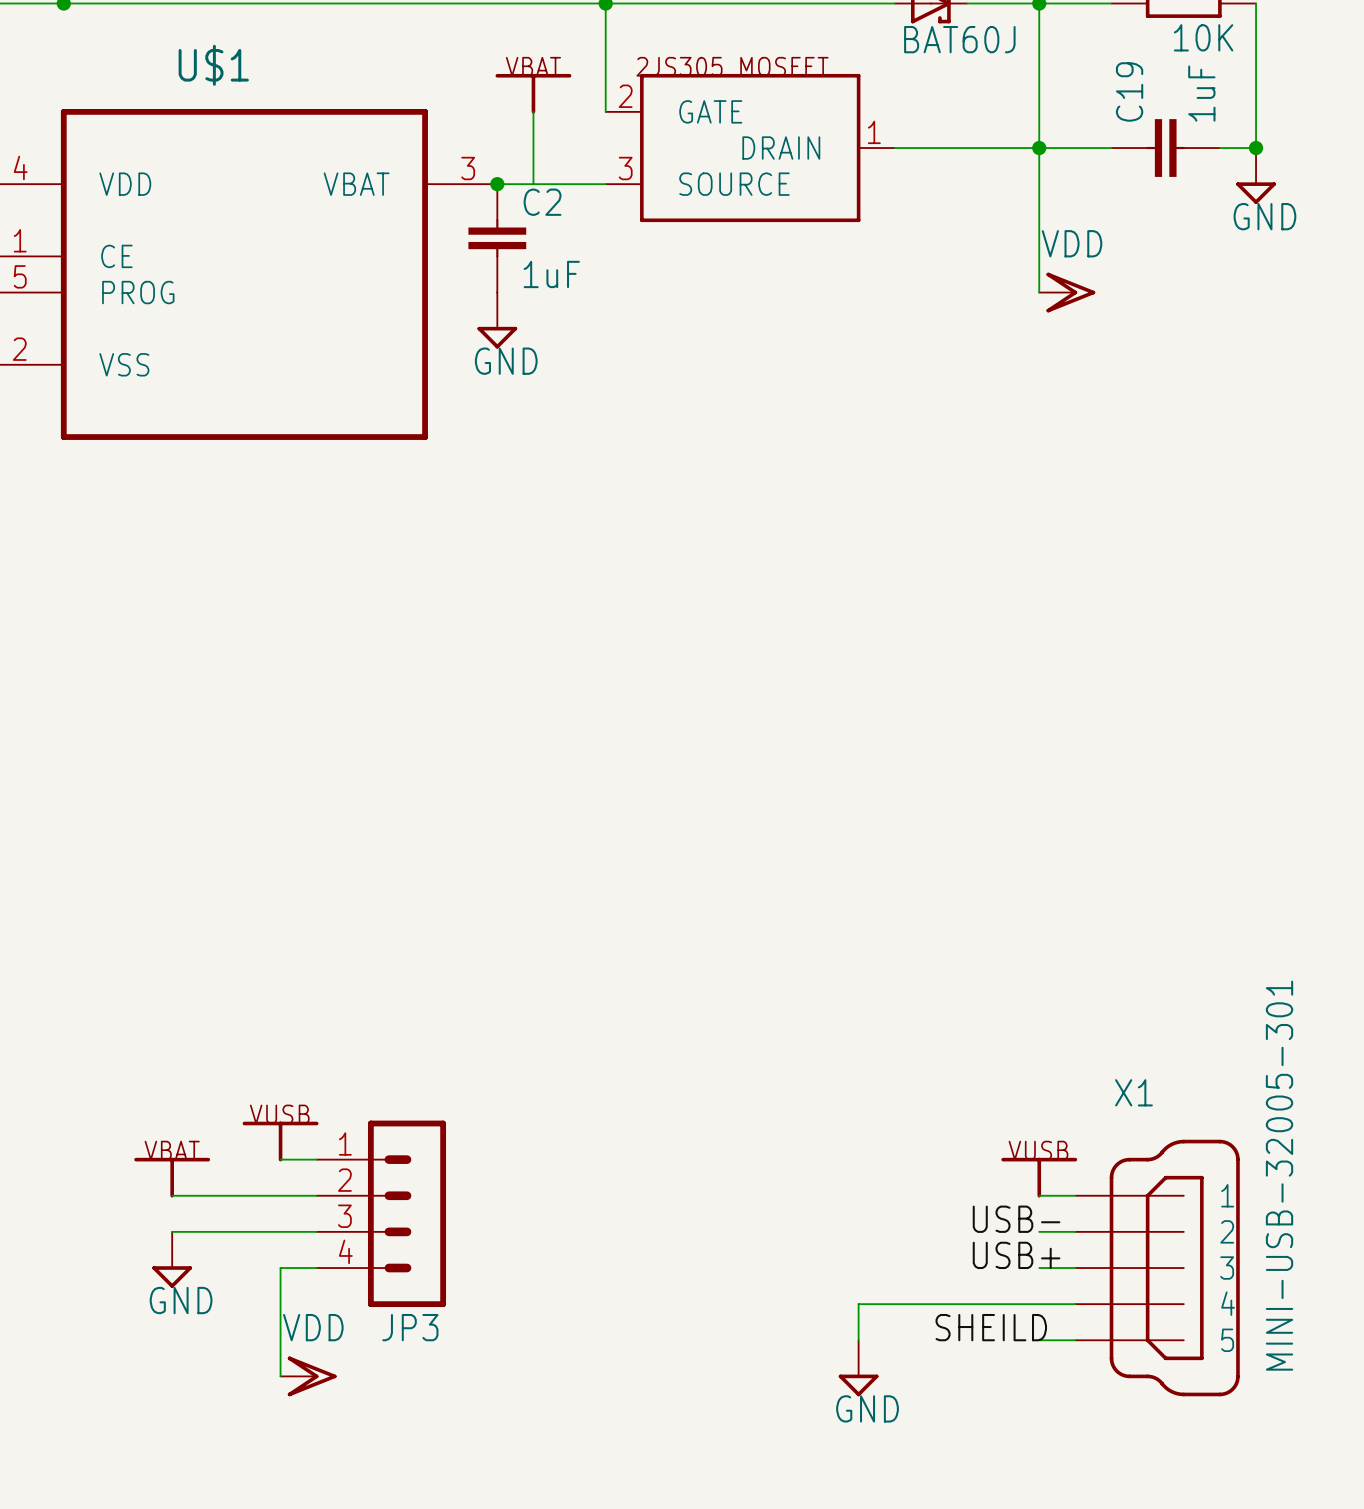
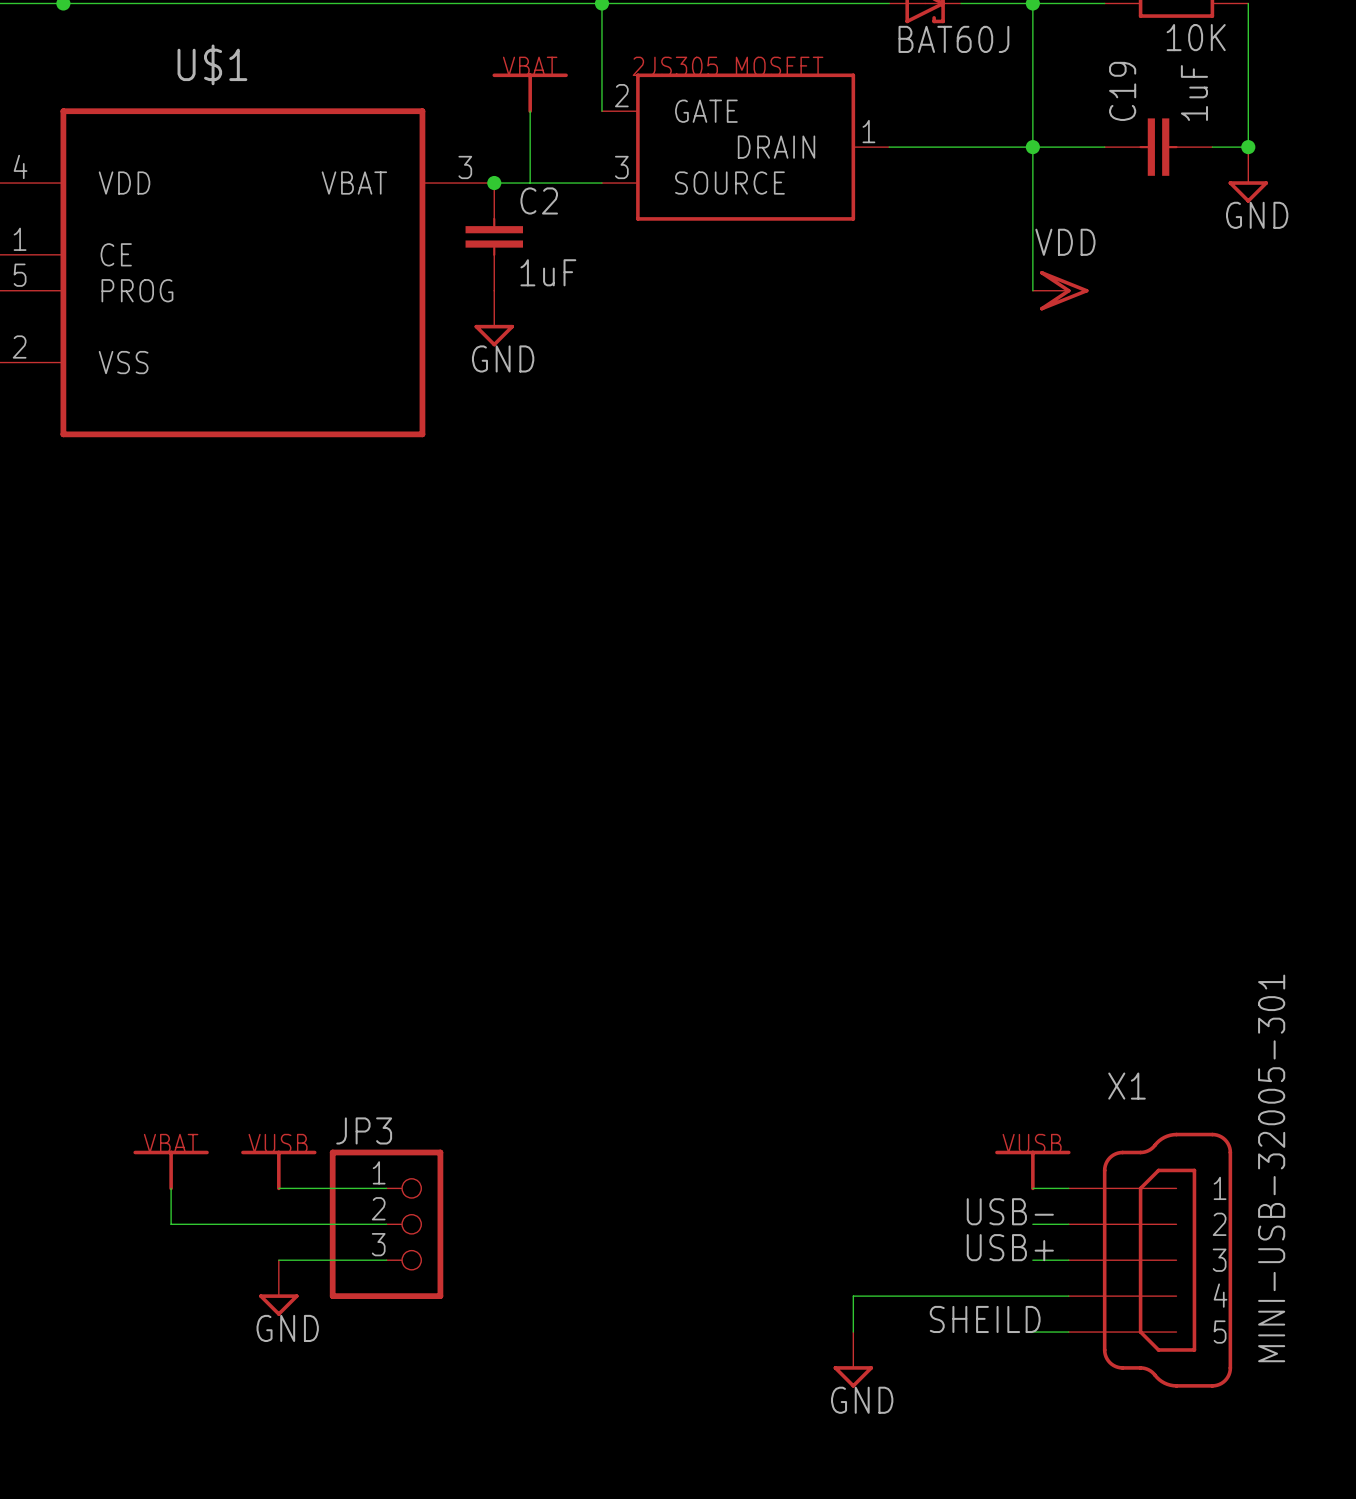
JP3 symbol: [316, 1120, 447, 1308] -> [329, 1149, 444, 1299]
power symbol position: (280, 1141) -> (278, 1170)
wire: (172, 1195) (280, 1195) -> (171, 1188) (171, 1224)
power symbol position: GND (172, 1259) -> GND (278, 1288)
wire: (280, 1268) (280, 1376) -> none
JP3 name position: JP3 (410, 1327) -> JP3 (364, 1130)
power symbol: VDD (308, 1376) -> none

